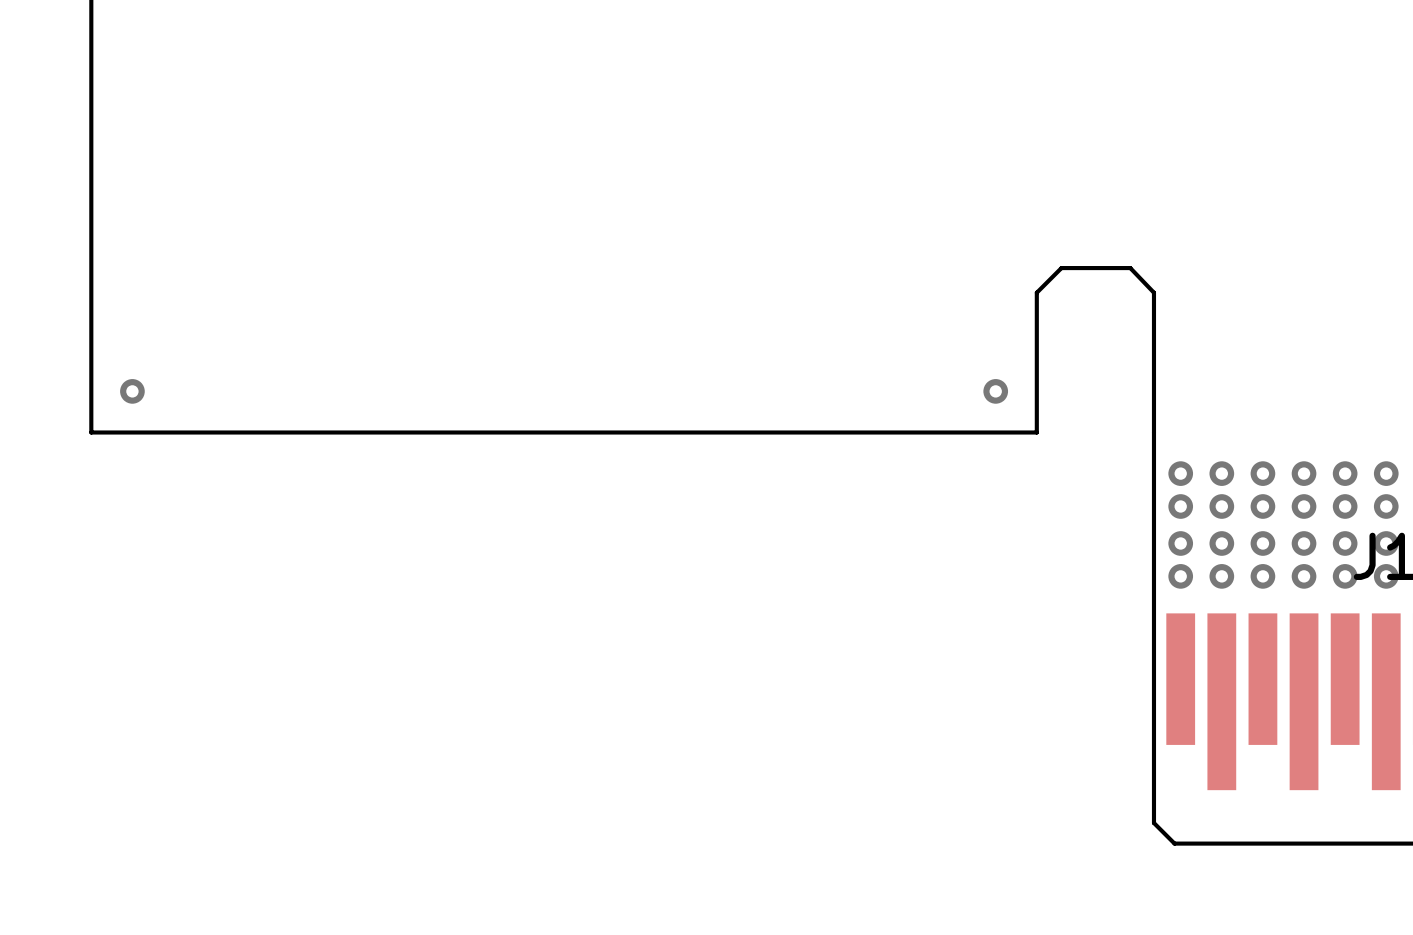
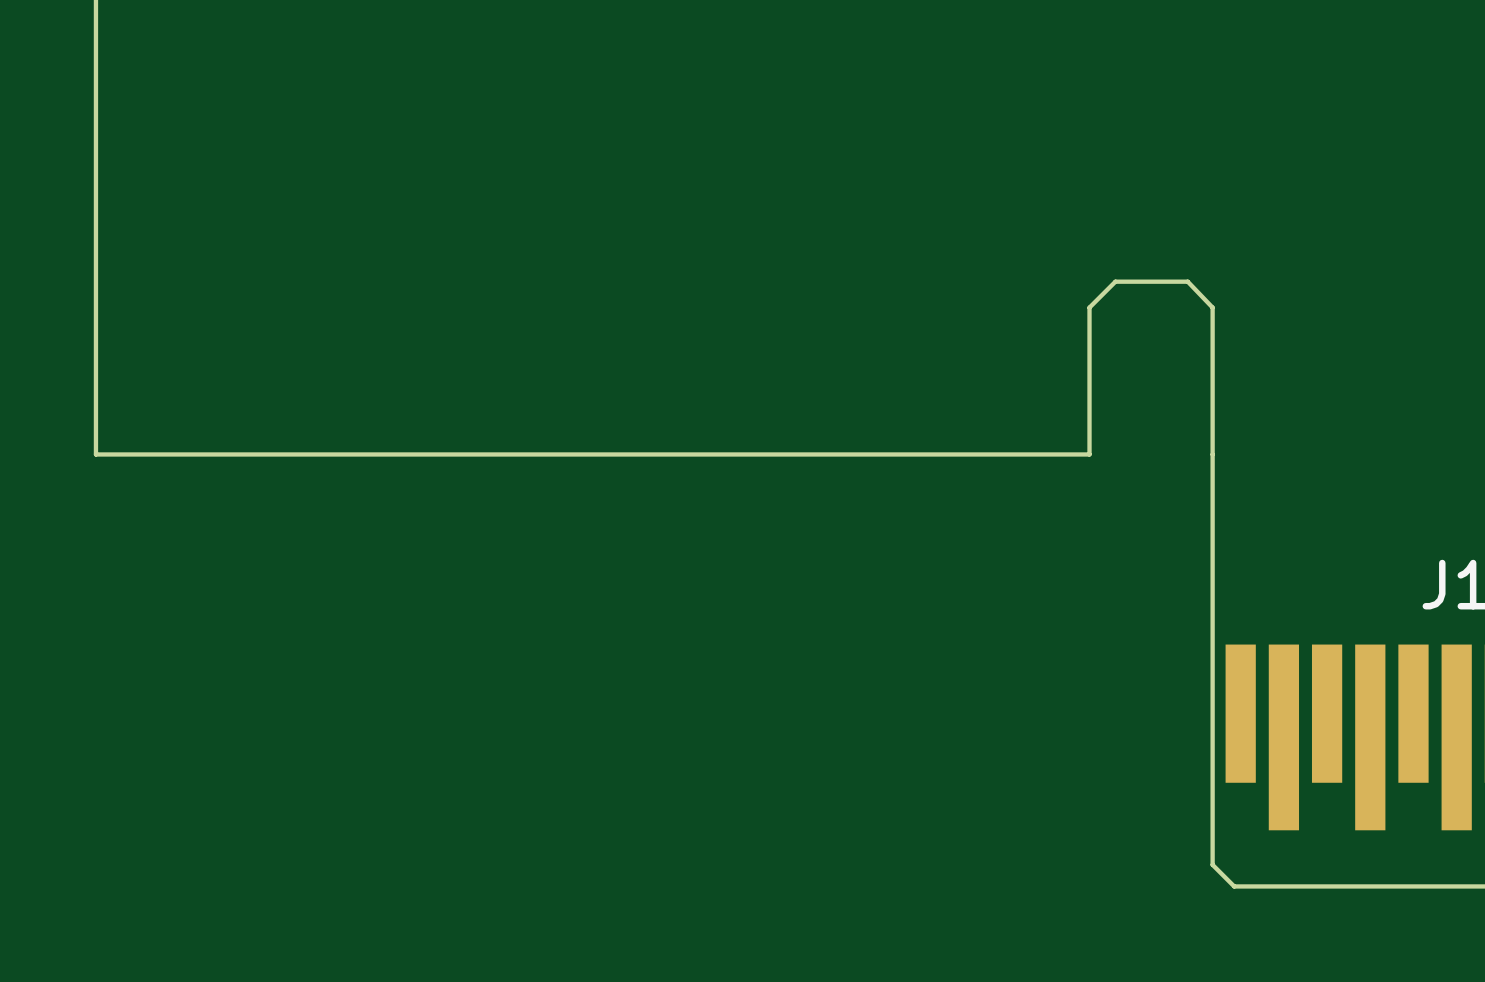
via: (132, 391) -> none
via: (995, 391) -> none
via: (1180, 473) -> none
via: (1221, 473) -> none
via: (1262, 473) -> none
via: (1304, 473) -> none
via: (1345, 473) -> none
via: (1386, 473) -> none
via: (1180, 506) -> none
via: (1221, 506) -> none
via: (1262, 506) -> none
via: (1304, 506) -> none
via: (1345, 506) -> none
via: (1386, 506) -> none
via: (1180, 543) -> none
via: (1221, 543) -> none
via: (1262, 543) -> none
via: (1304, 543) -> none
via: (1345, 543) -> none
via: (1386, 543) -> none
via: (1180, 576) -> none
via: (1221, 576) -> none
via: (1262, 576) -> none
via: (1304, 576) -> none
via: (1345, 576) -> none
via: (1386, 576) -> none

